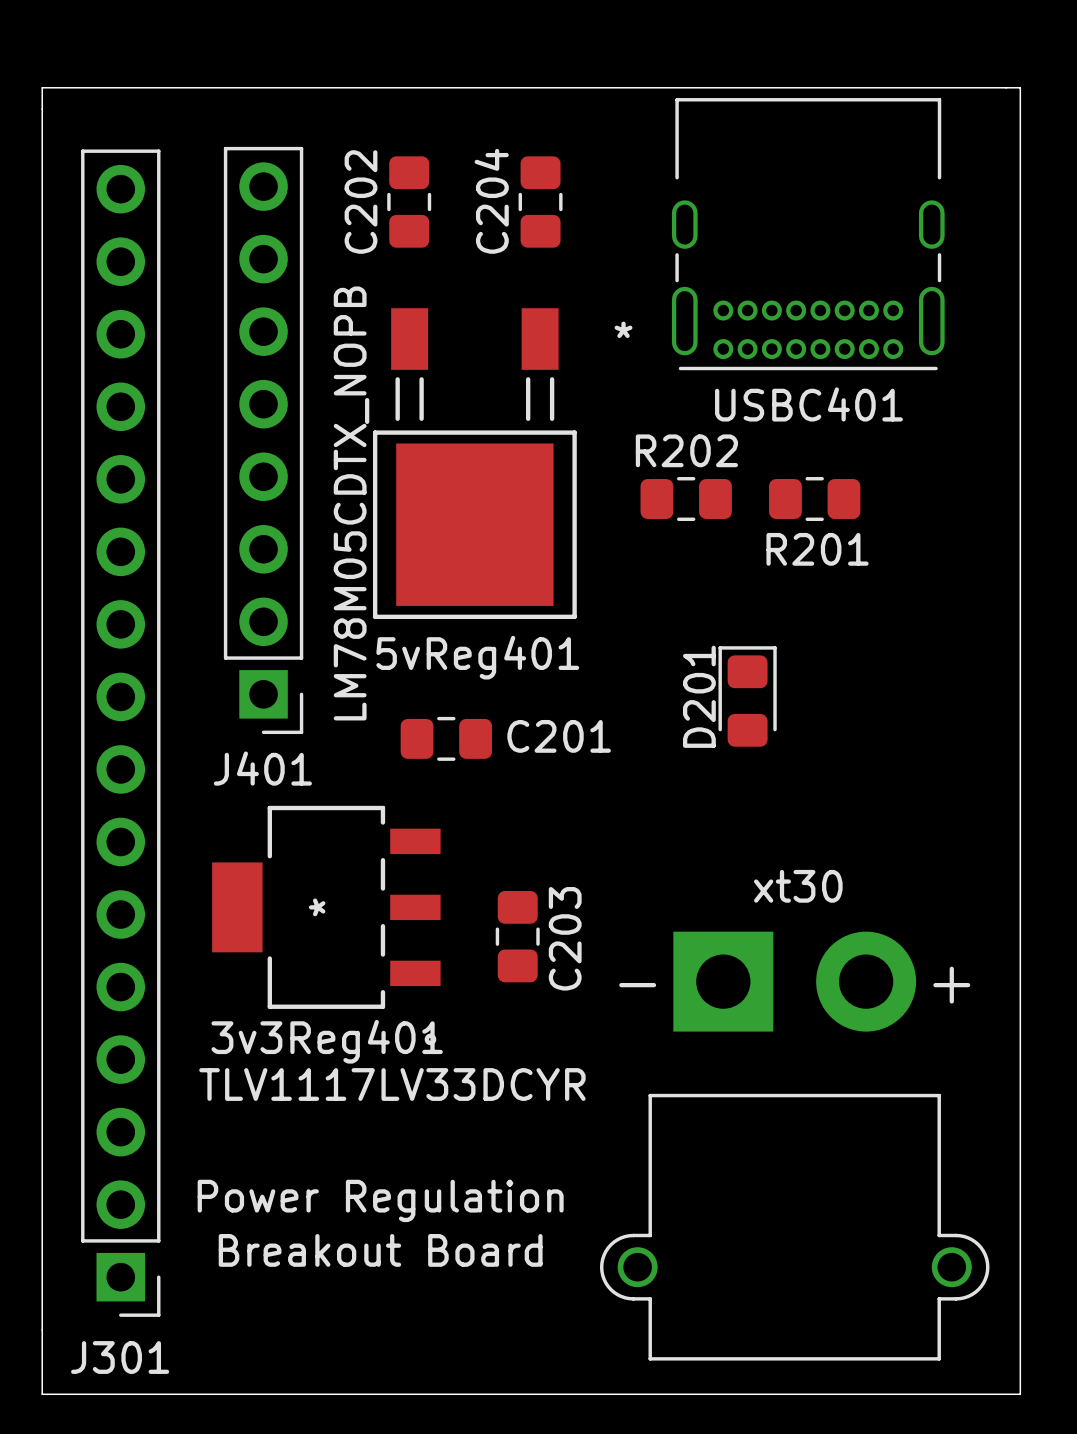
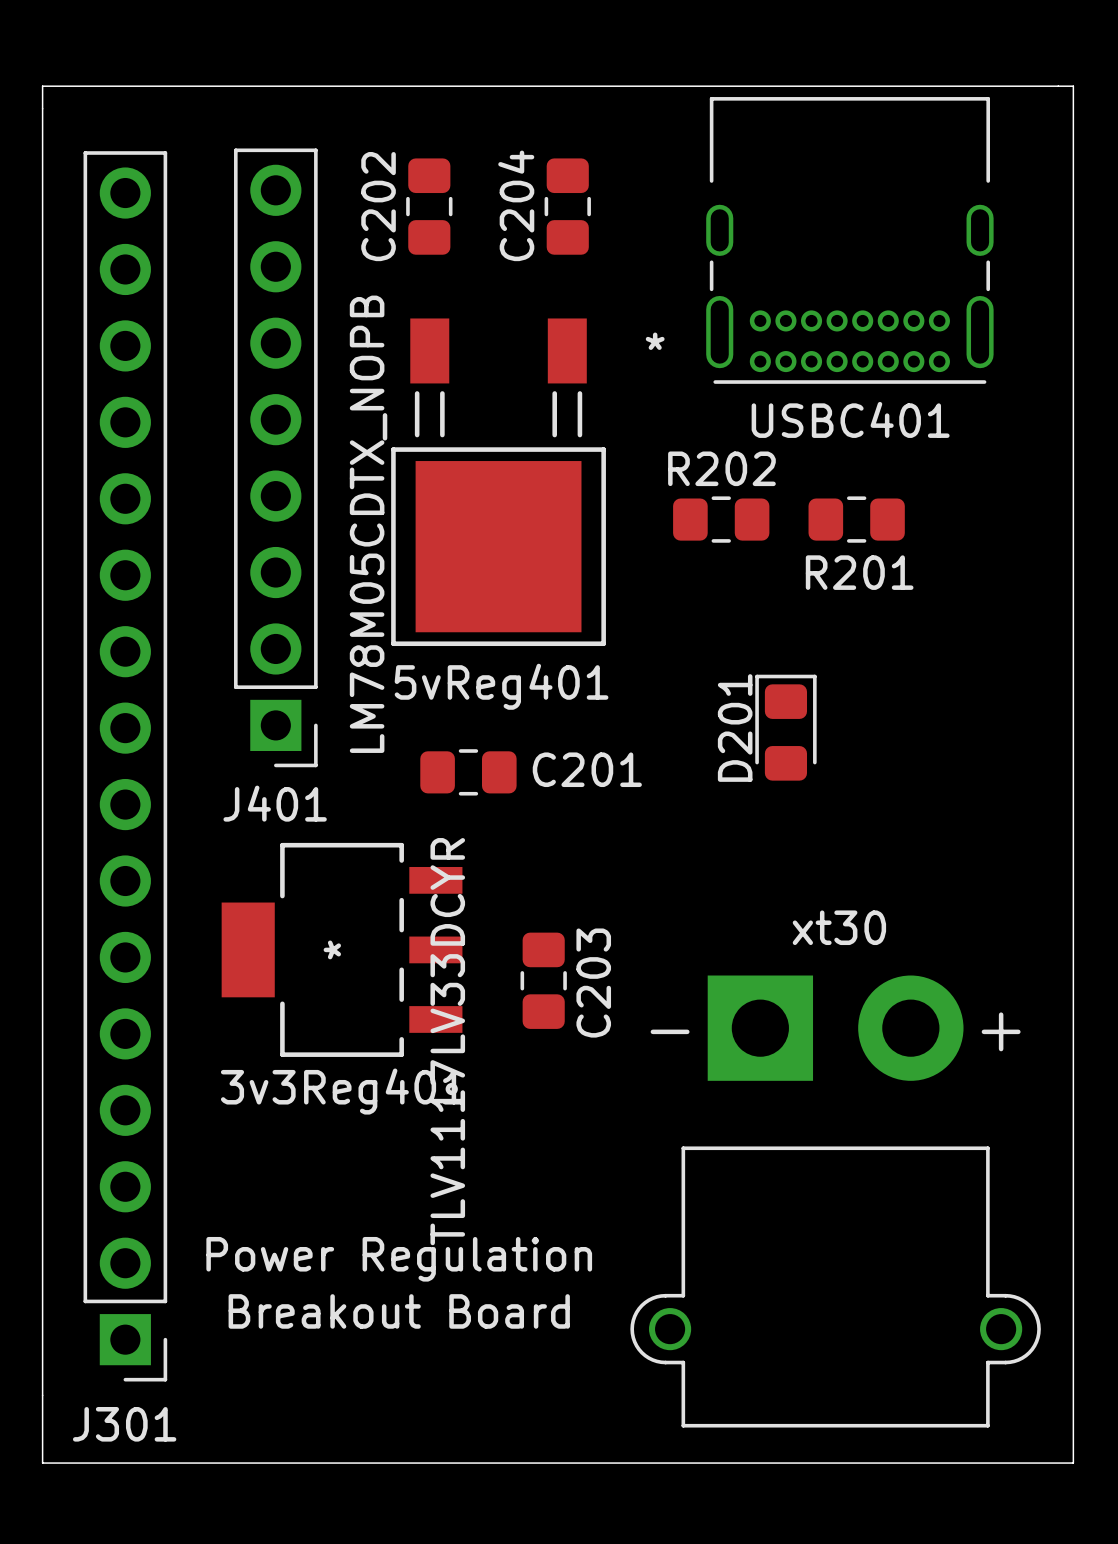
3v3Reg401 value rotation: 0° (392, 1084) -> 90° counterclockwise (447, 1041)

